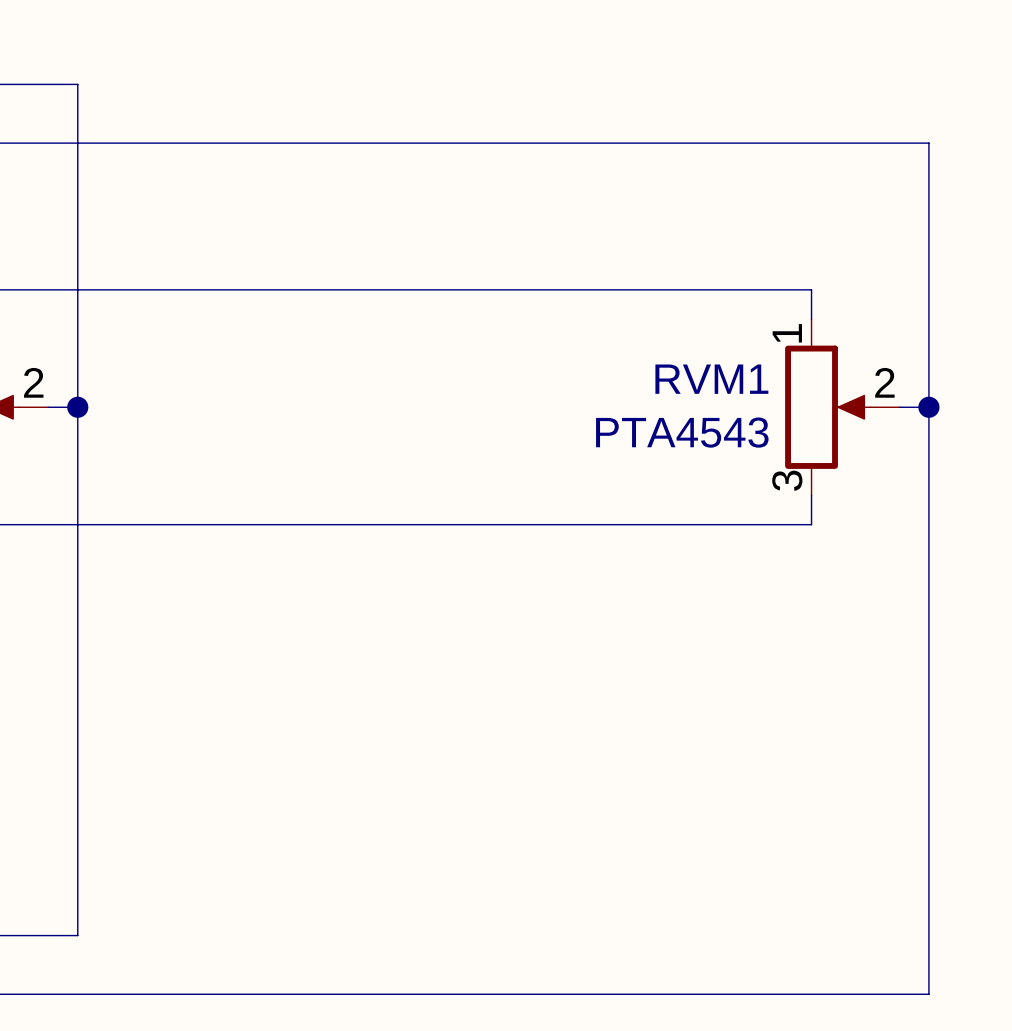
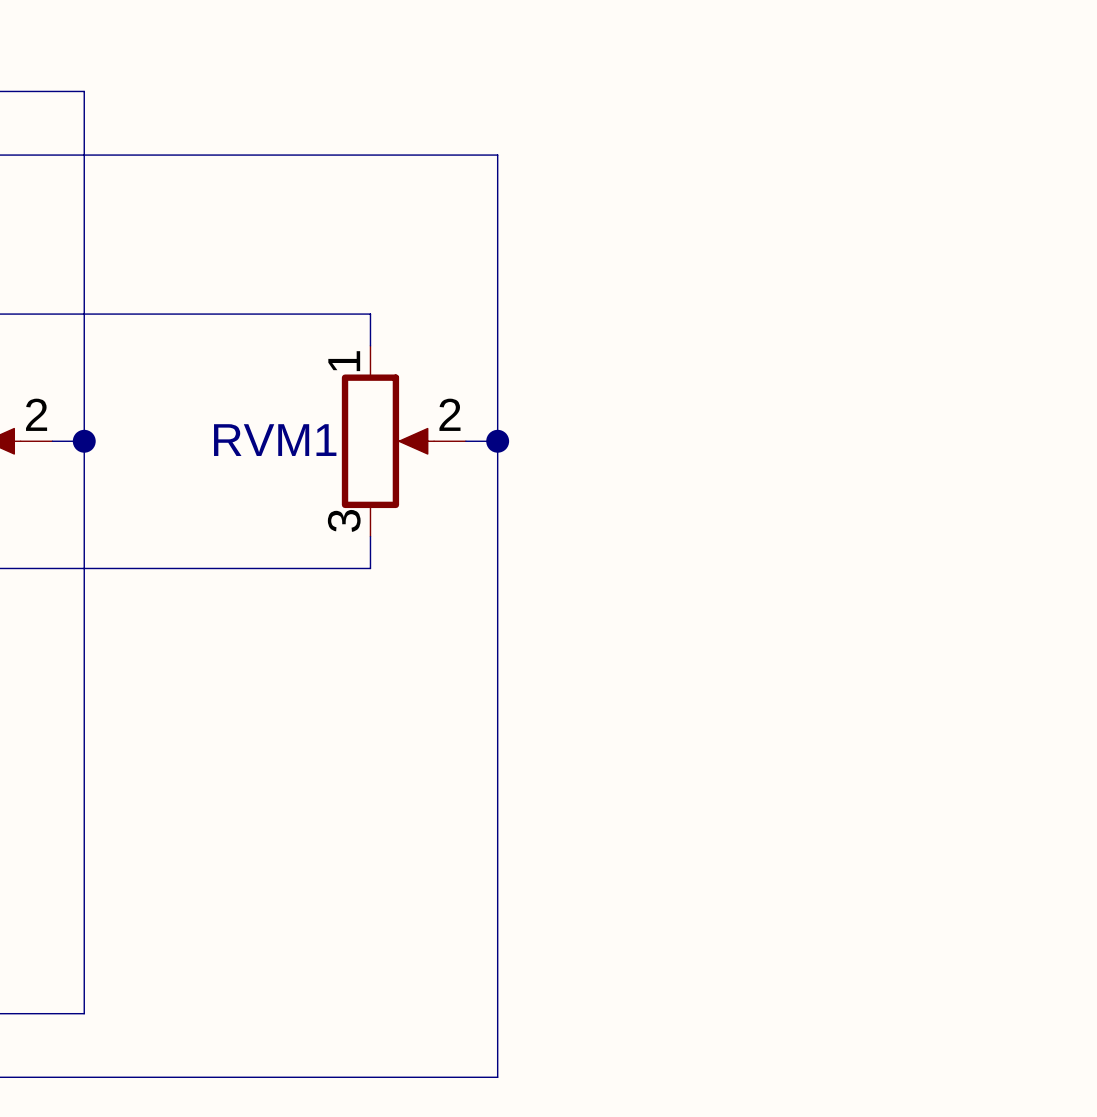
wire: (459, 143) (928, 143) (928, 994) (459, 994) -> (497, 155) (497, 1077)
wire: (341, 289) (811, 289) (811, 319) -> (370, 314) (370, 345)
RVM1 name position: RVM1 (711, 379) -> RVM1 (275, 440)
junction: none -> (497, 441)
RVM1 position: (842, 407) -> (403, 441)
wire: (899, 407) (928, 407) -> (465, 441) (497, 441)
junction: (928, 407) -> none
RVM1 value: PTA4543 (682, 432) -> none
wire: (811, 495) (811, 524) (341, 524) -> (370, 536) (370, 568)

